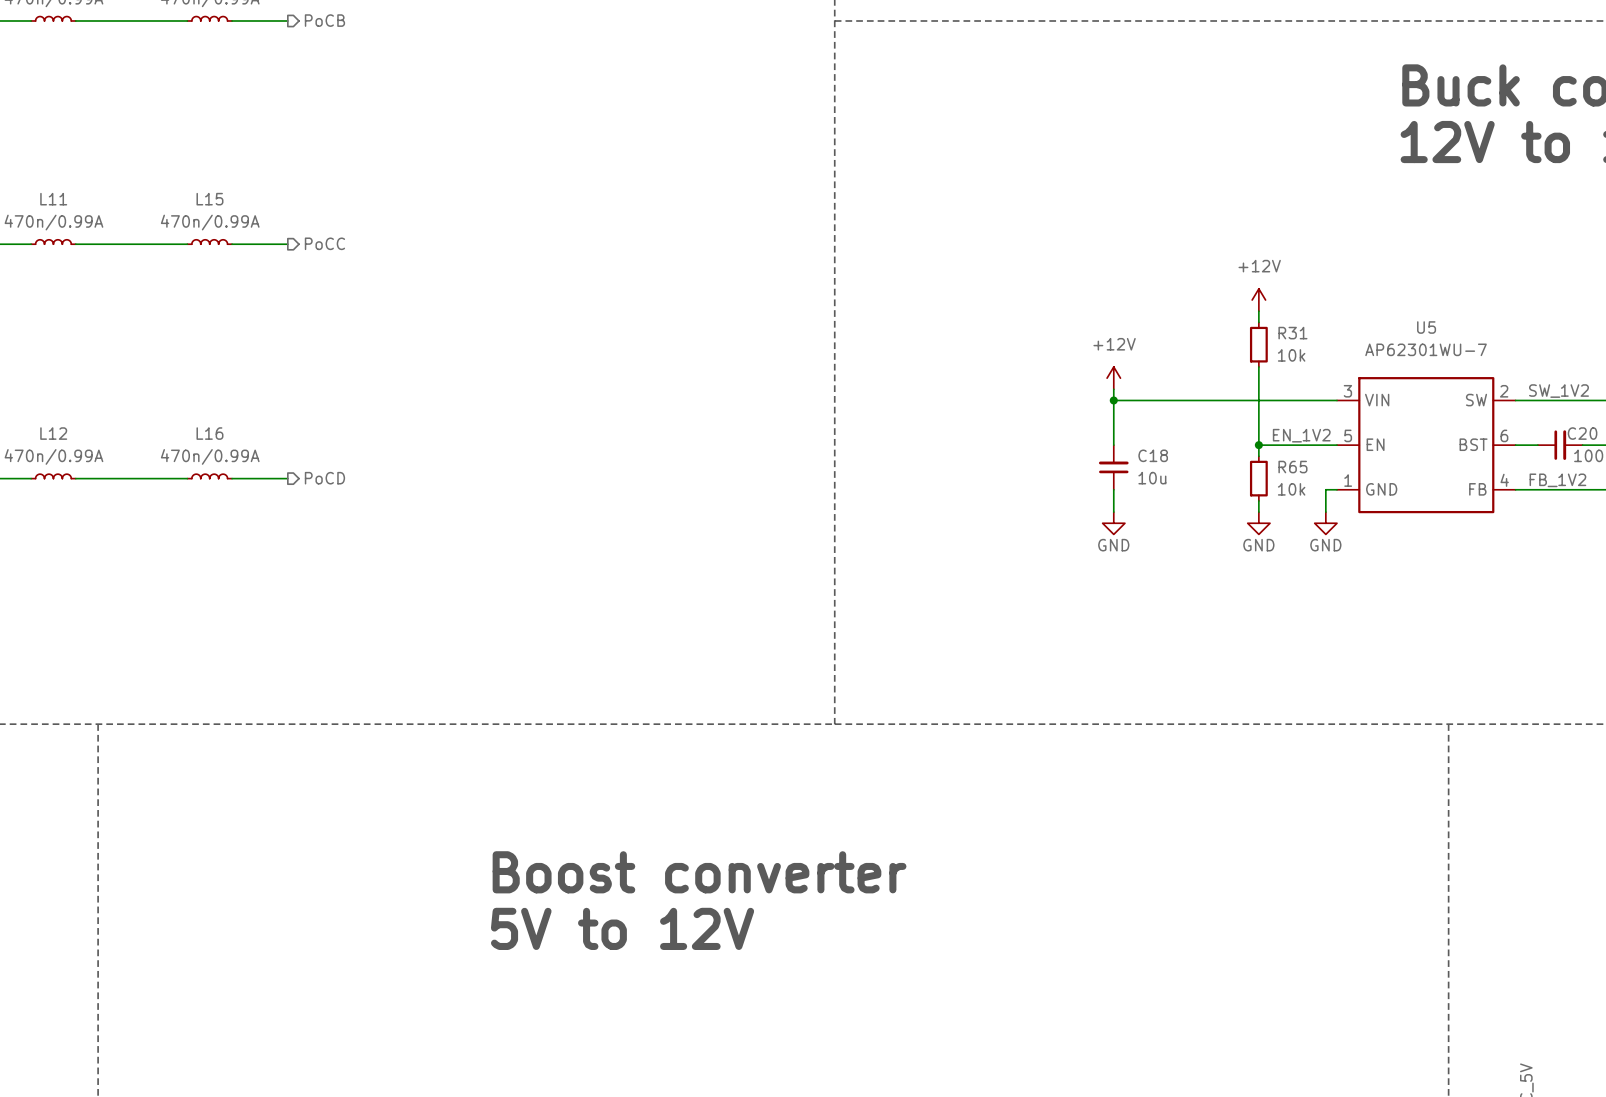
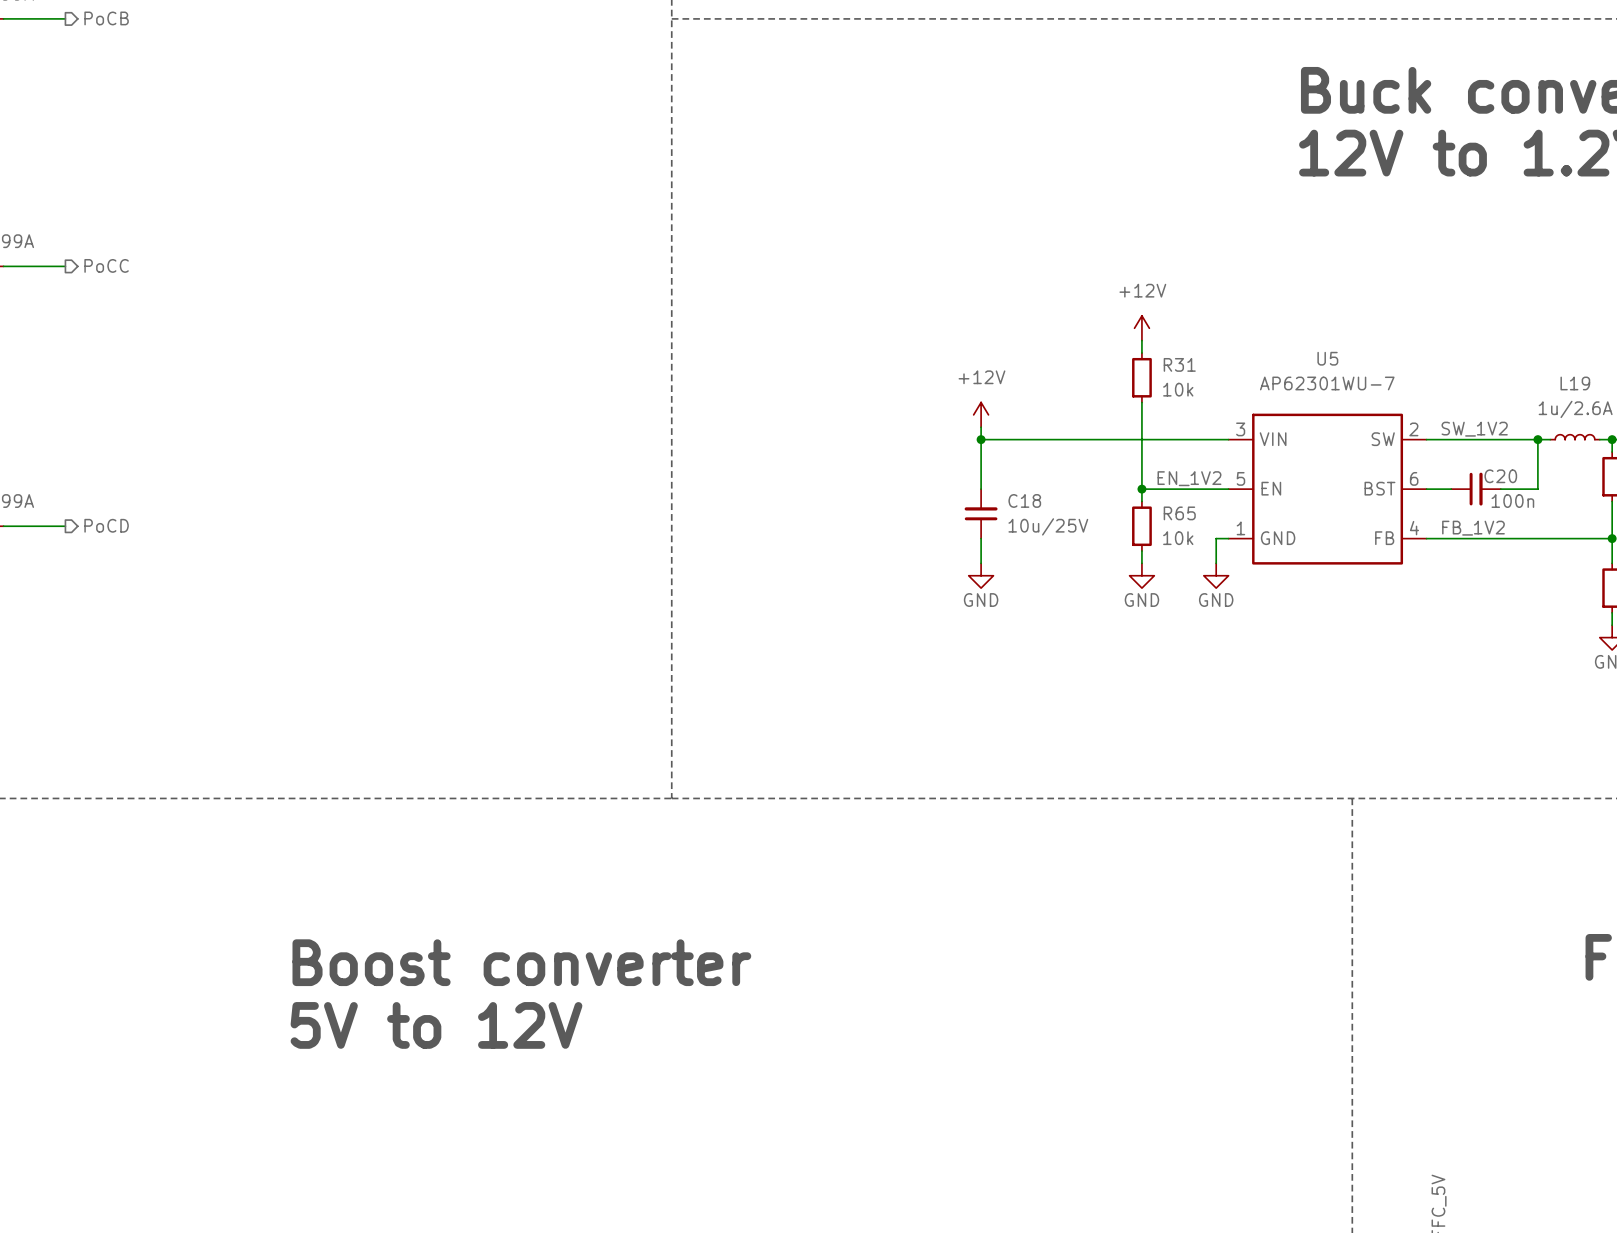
C18 text: 10u (1152, 478) -> 10u/25V (1048, 526)

